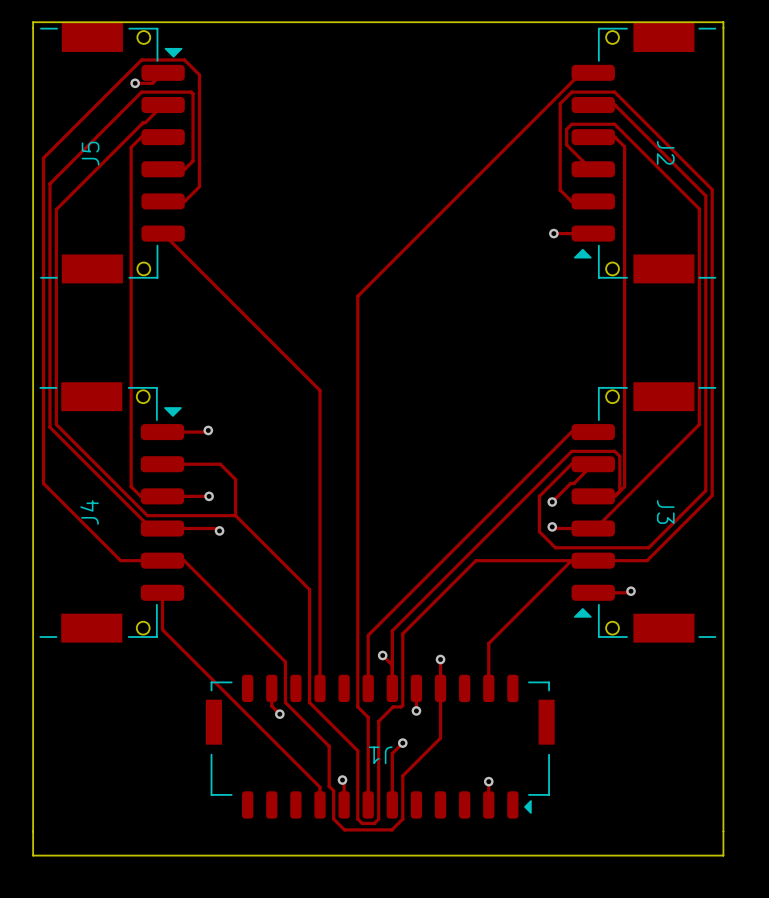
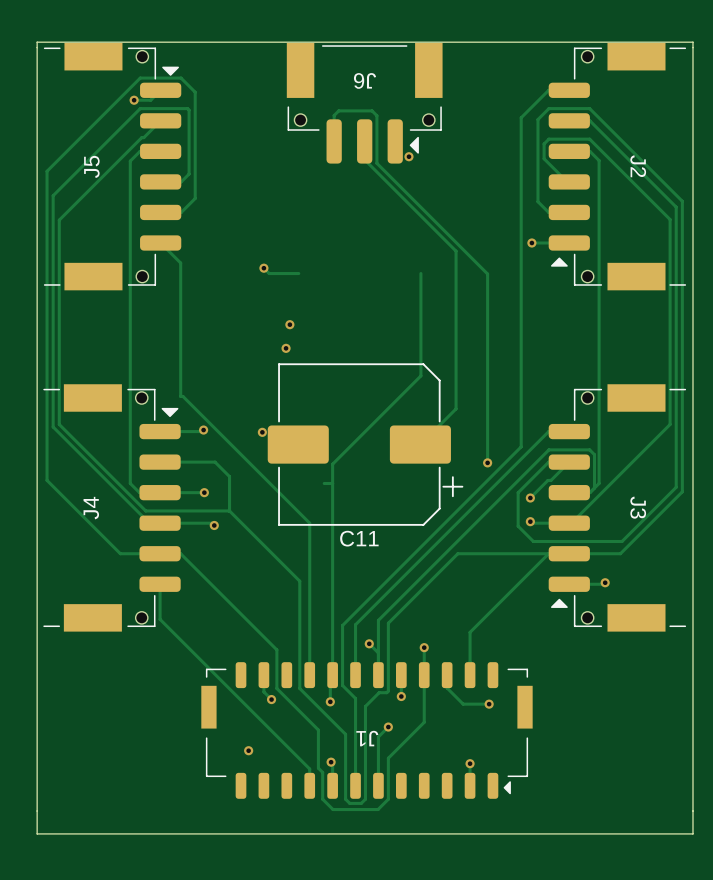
track: (581, 72) (357, 296) (357, 706) (368, 717) -> (557, 90) (548, 90) (521, 117) (521, 446) (342, 625) (342, 685) (355, 698) (355, 702)
J6: none -> (364, 103)
track: none -> (334, 137) (334, 115) (338, 110) (372, 110) (376, 115) (376, 163) (487, 274) (487, 462)
track: none -> (364, 137) (364, 159) (456, 251) (456, 408) (420, 444)
via: none -> (408, 156)
track: (184, 254) (320, 390) (320, 528) -> (180, 263) (180, 396) (182, 396) (309, 523)
track: none -> (263, 268) (269, 273) (298, 273)
via: none -> (263, 268)
track: none -> (420, 273) (420, 375) (332, 464) (332, 675) (330, 677) (330, 701)
via: none -> (289, 324)
via: none -> (286, 348)
via: none -> (262, 432)
C11: none -> (365, 444)
via: none -> (487, 462)
track: none -> (324, 483) (332, 483)
track: none -> (447, 675) (447, 688) (463, 704) (489, 704)
via: none -> (330, 701)
via: none -> (489, 704)
via: none -> (248, 750)

